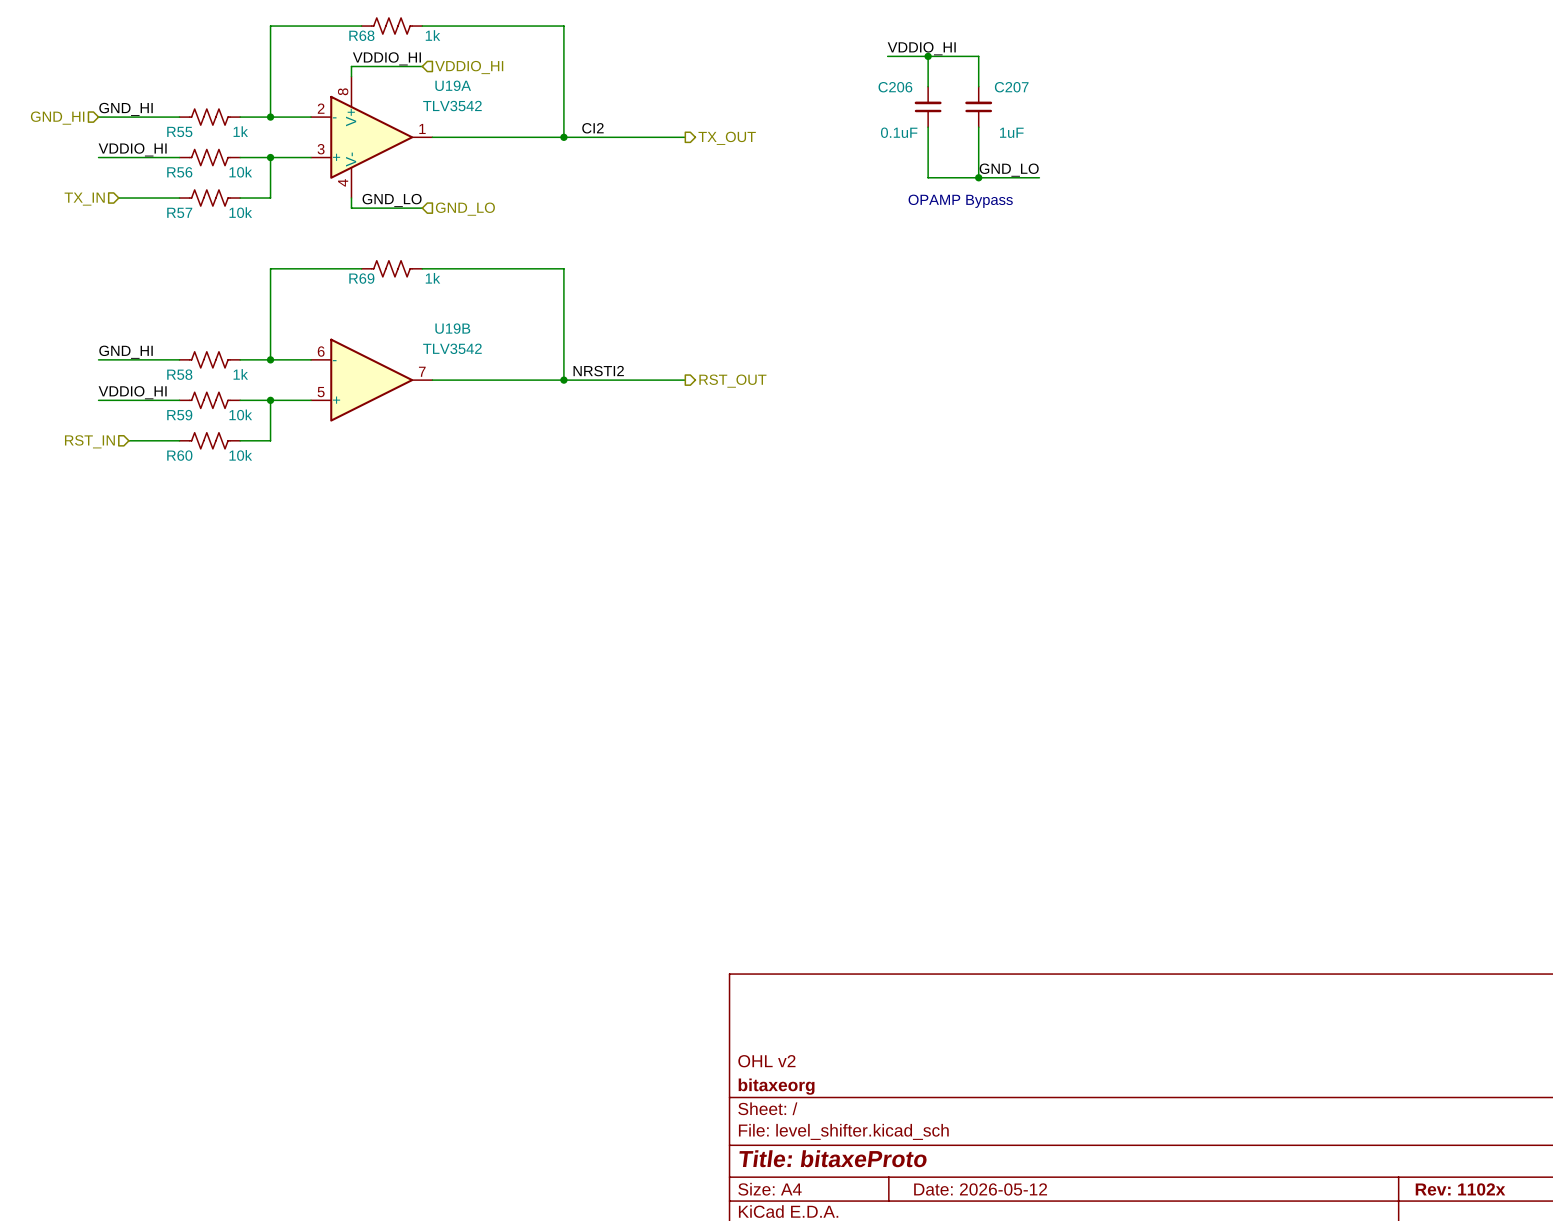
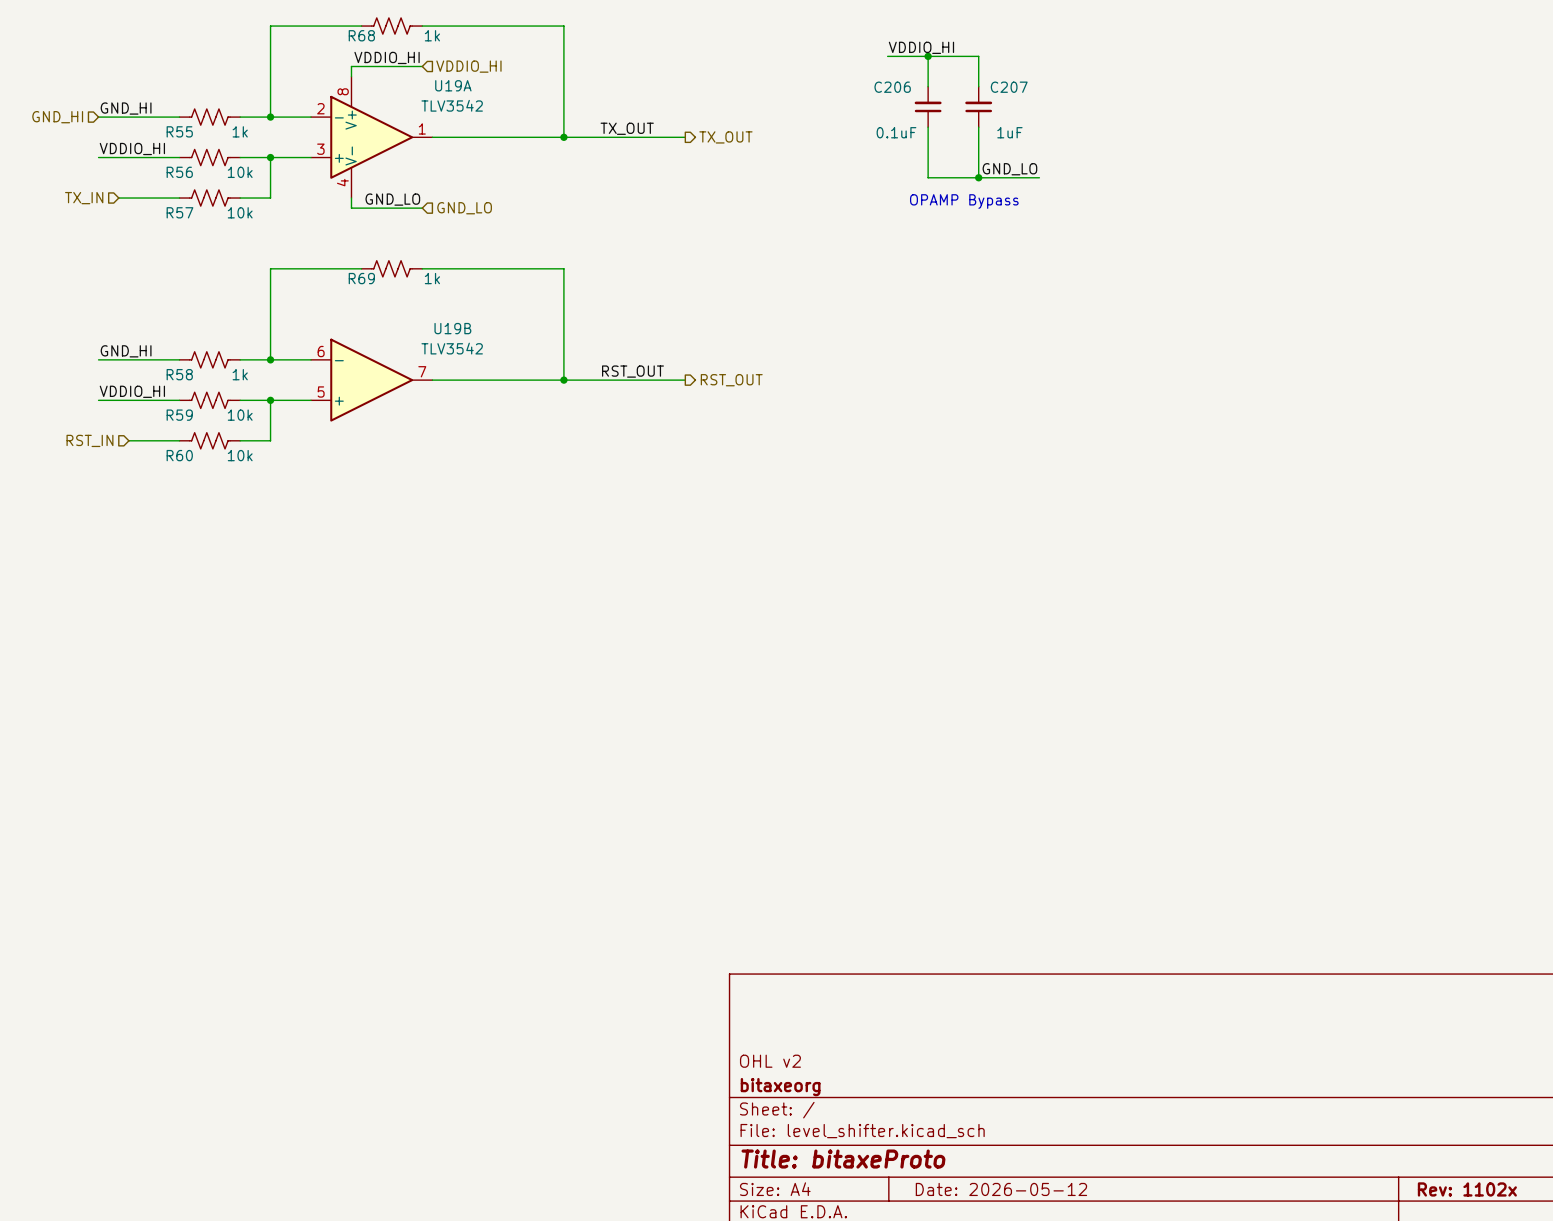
label: CI2 (592, 128) -> none
label: none -> TX_OUT (627, 128)
label: NRSTI2 (598, 371) -> none
label: none -> RST_OUT (632, 371)

